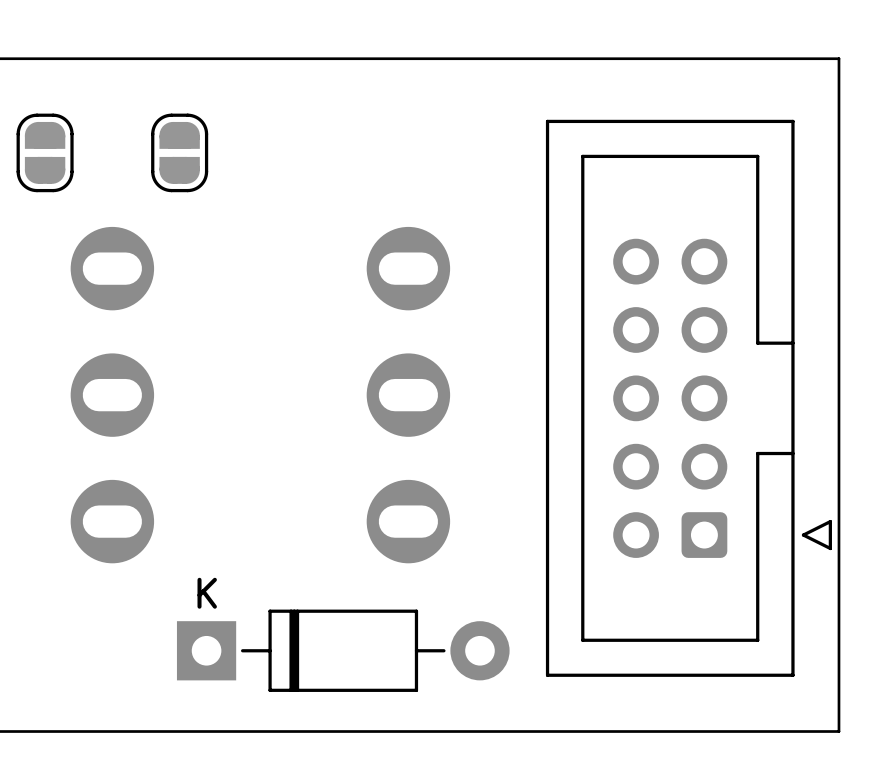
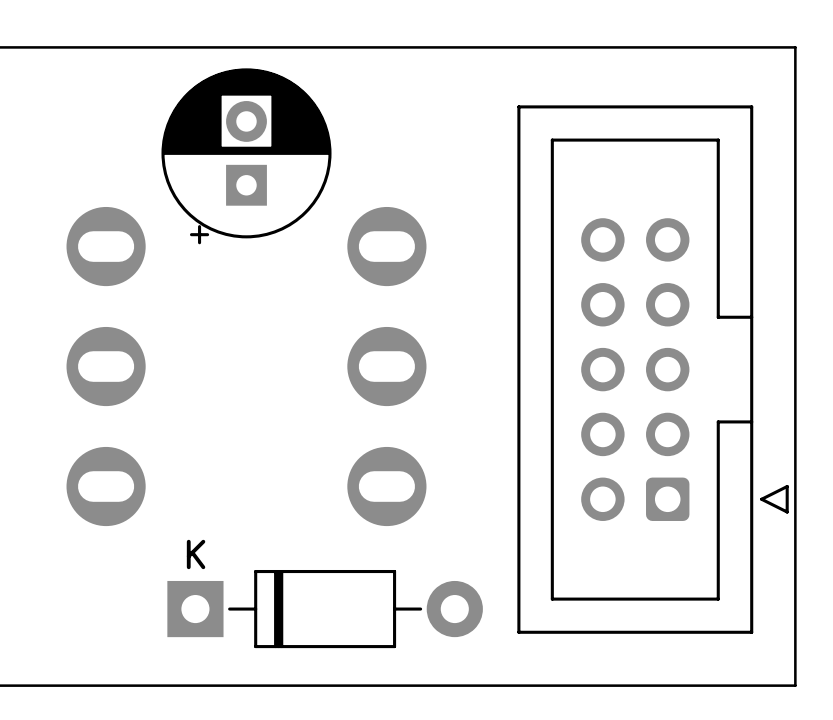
part: (45, 152) -> none
part: (179, 152) -> none
part: none -> (246, 156)

